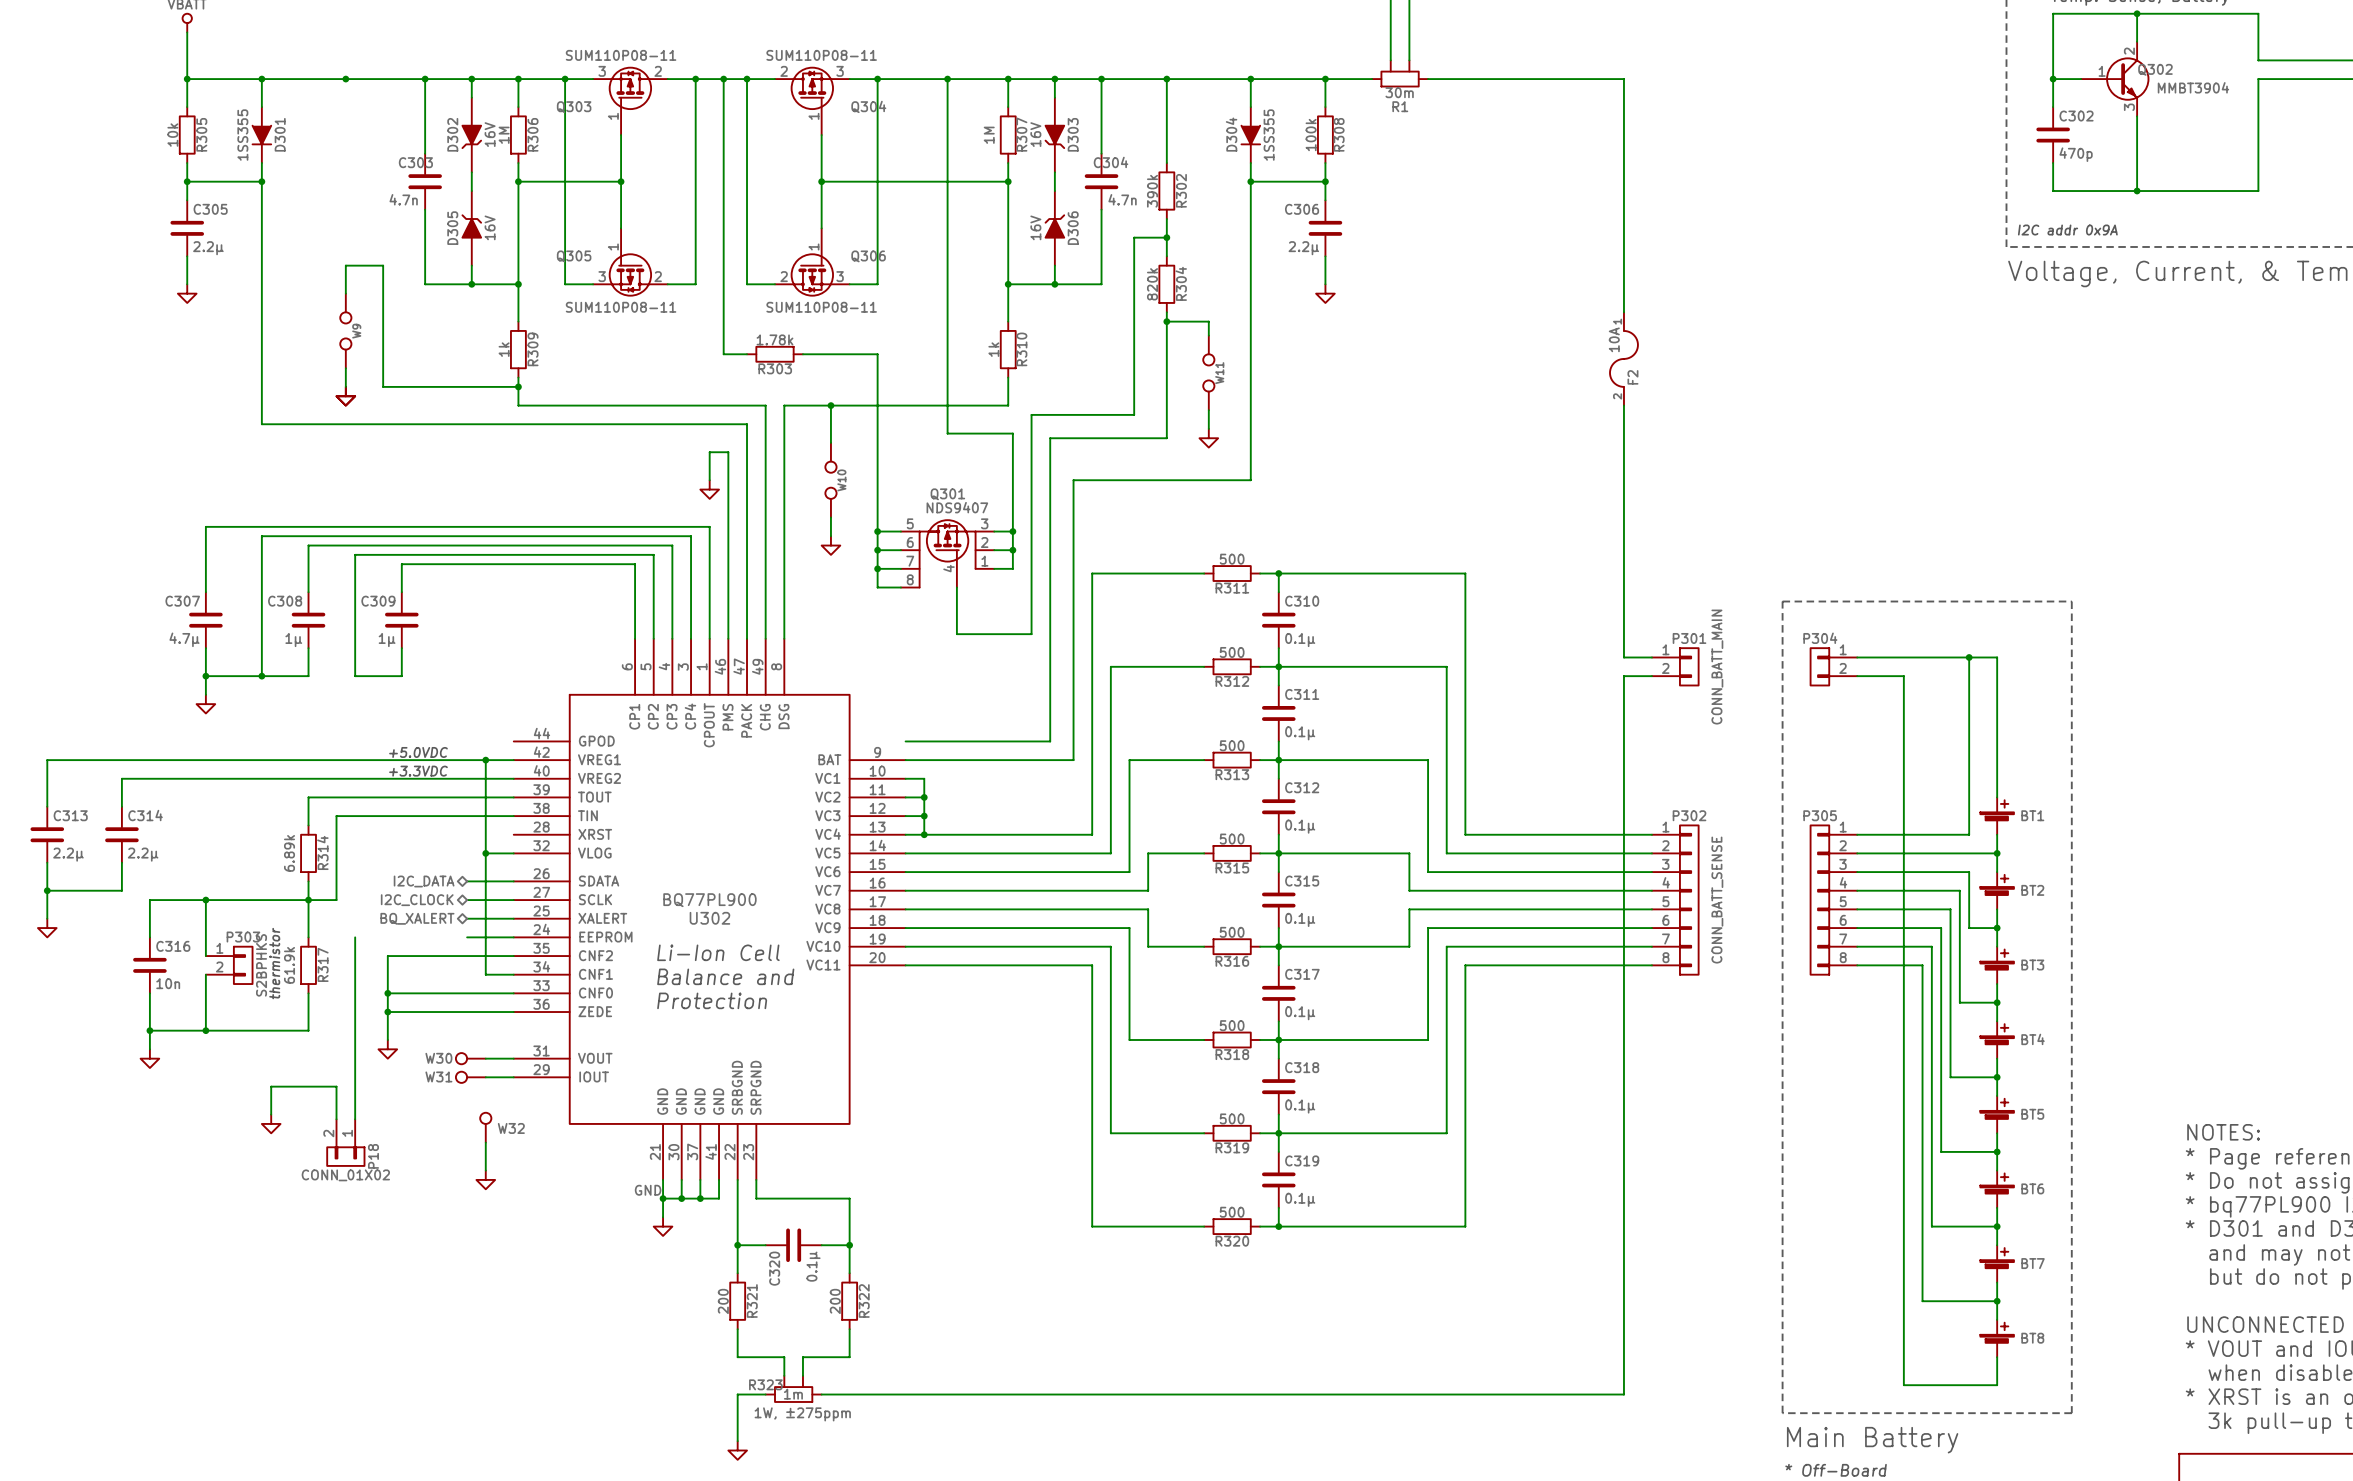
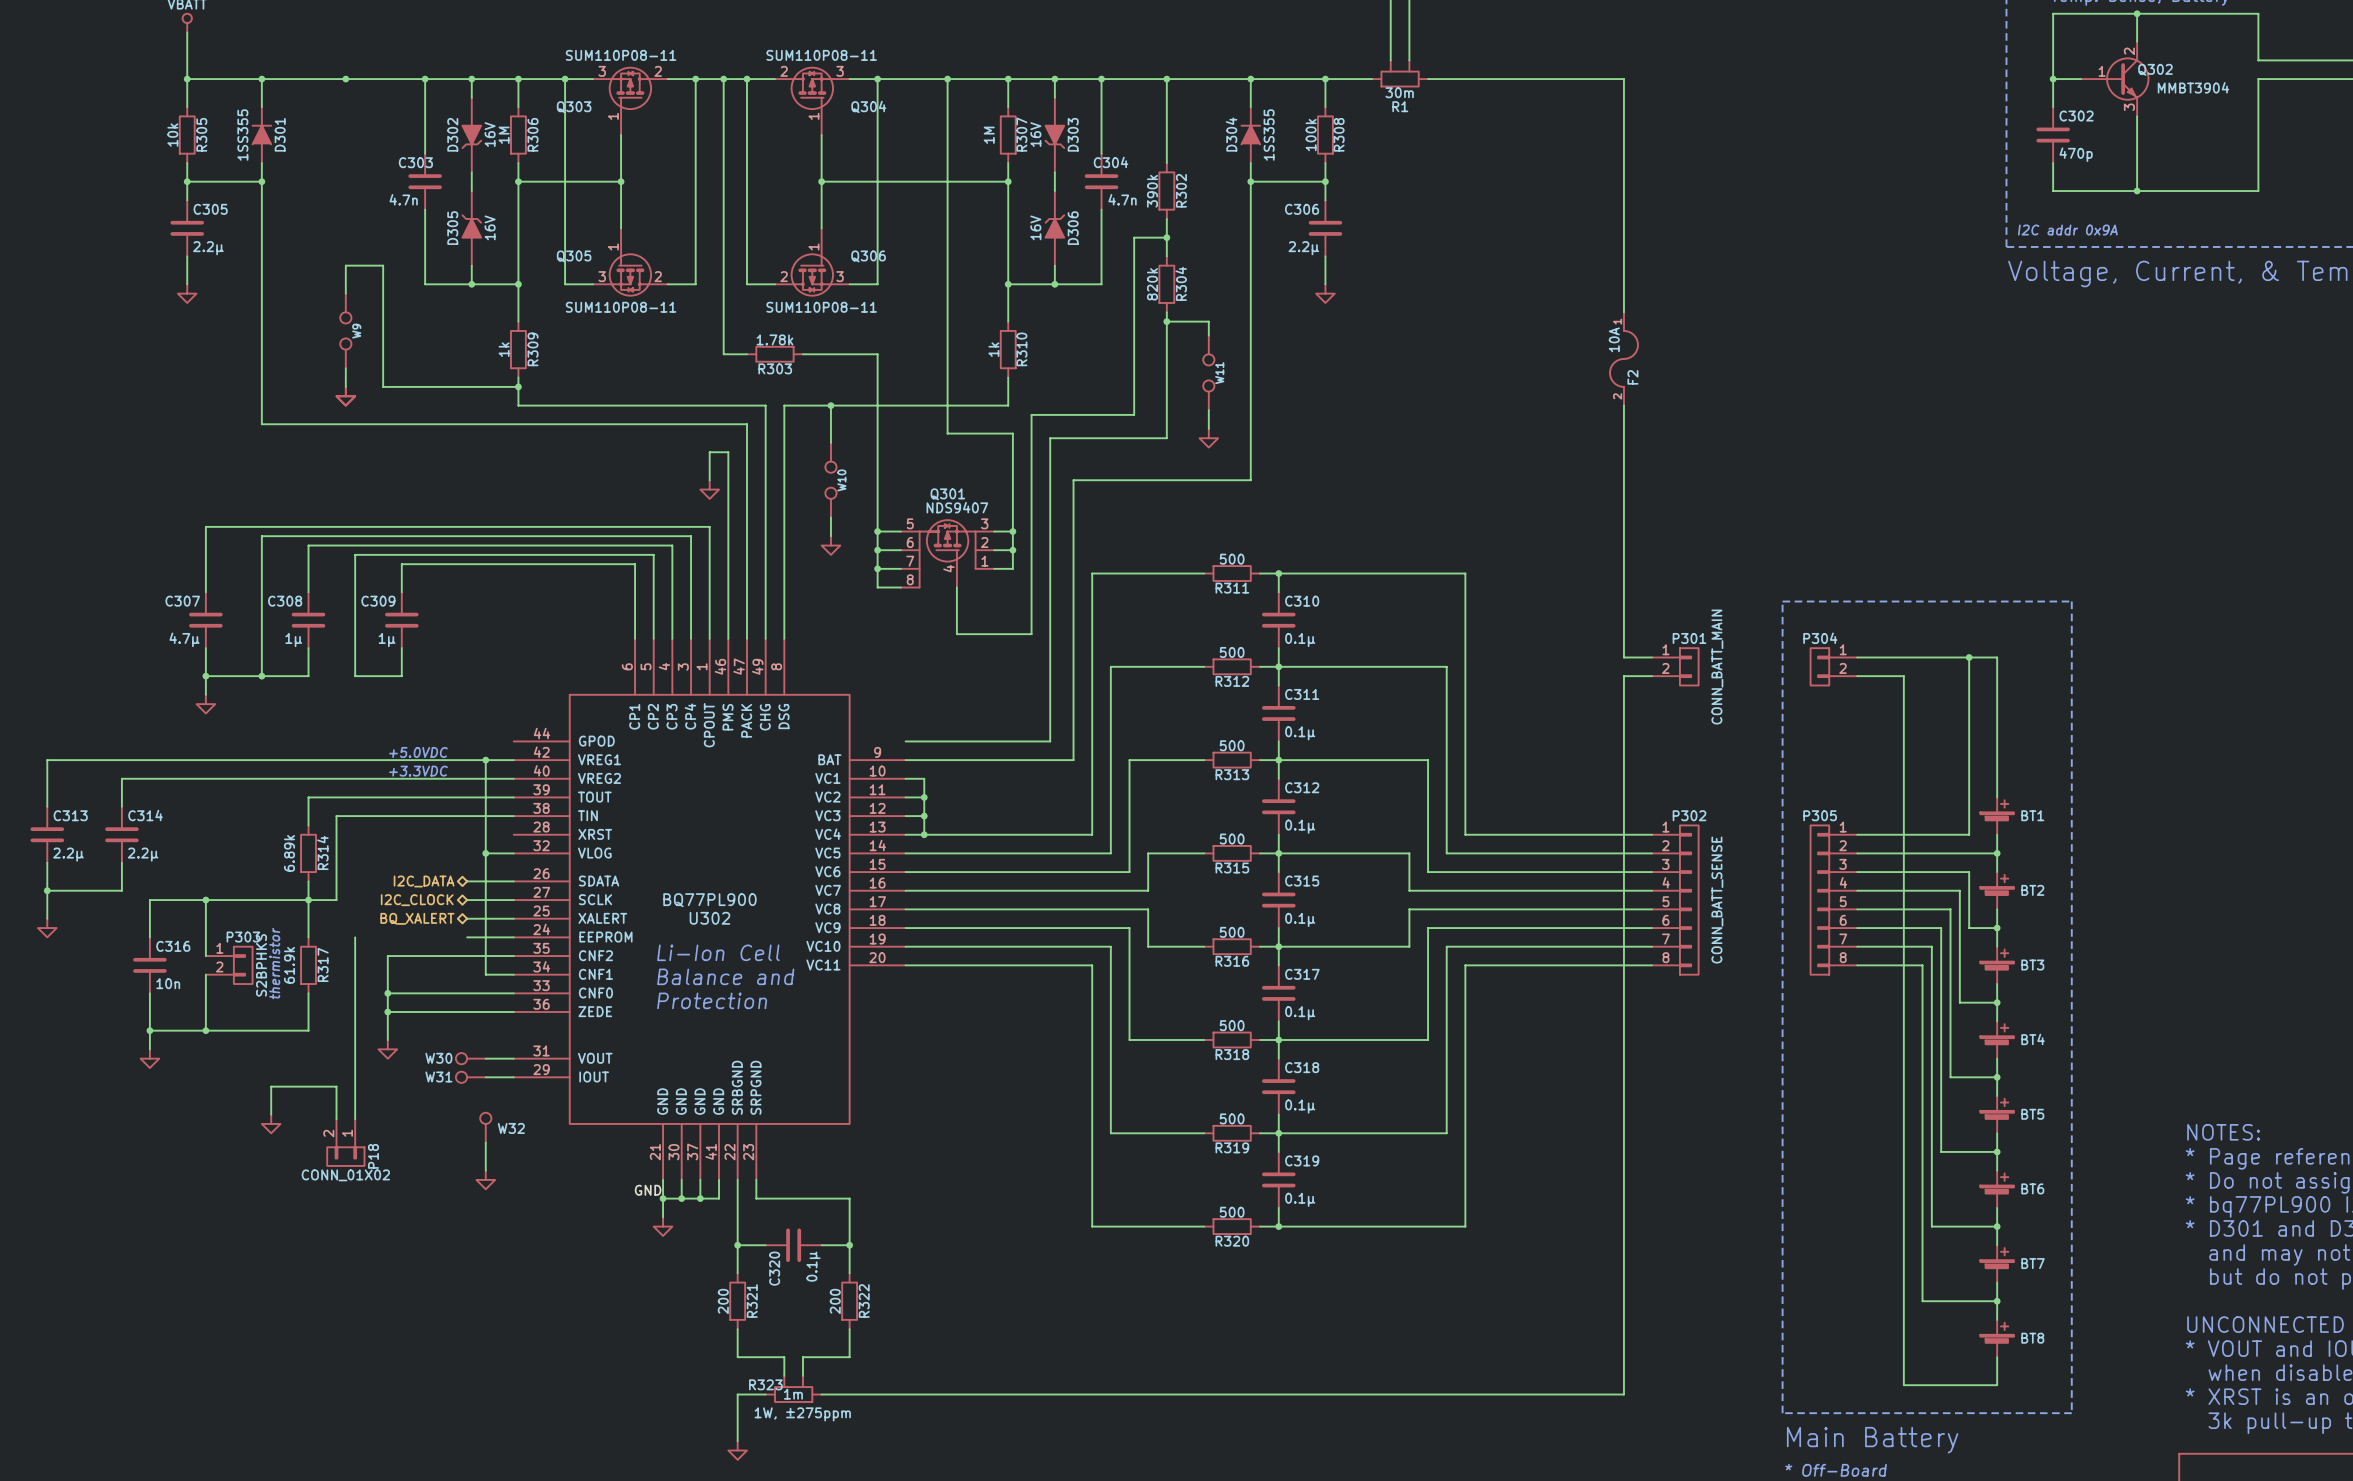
D301 rotation: 0° (261, 135) -> 180° (261, 134)
D304 rotation: 0° (1250, 135) -> 180° (1250, 134)

